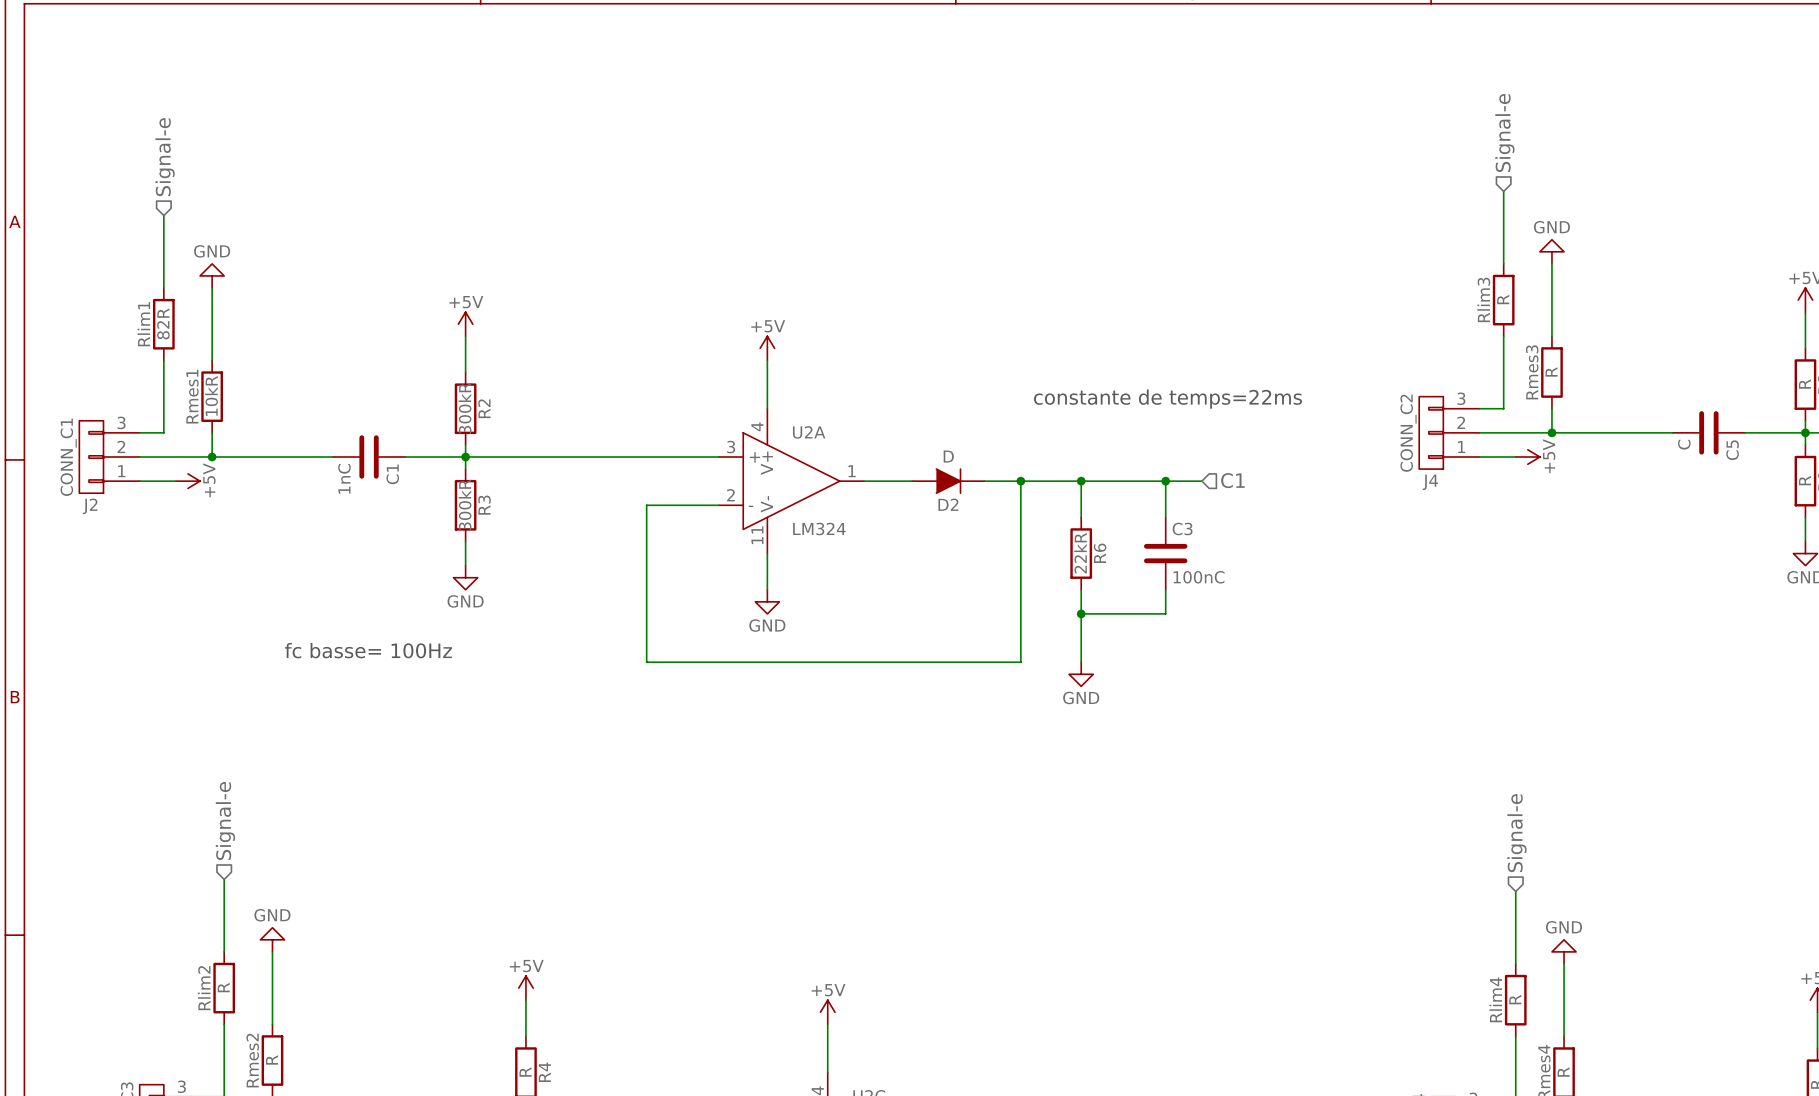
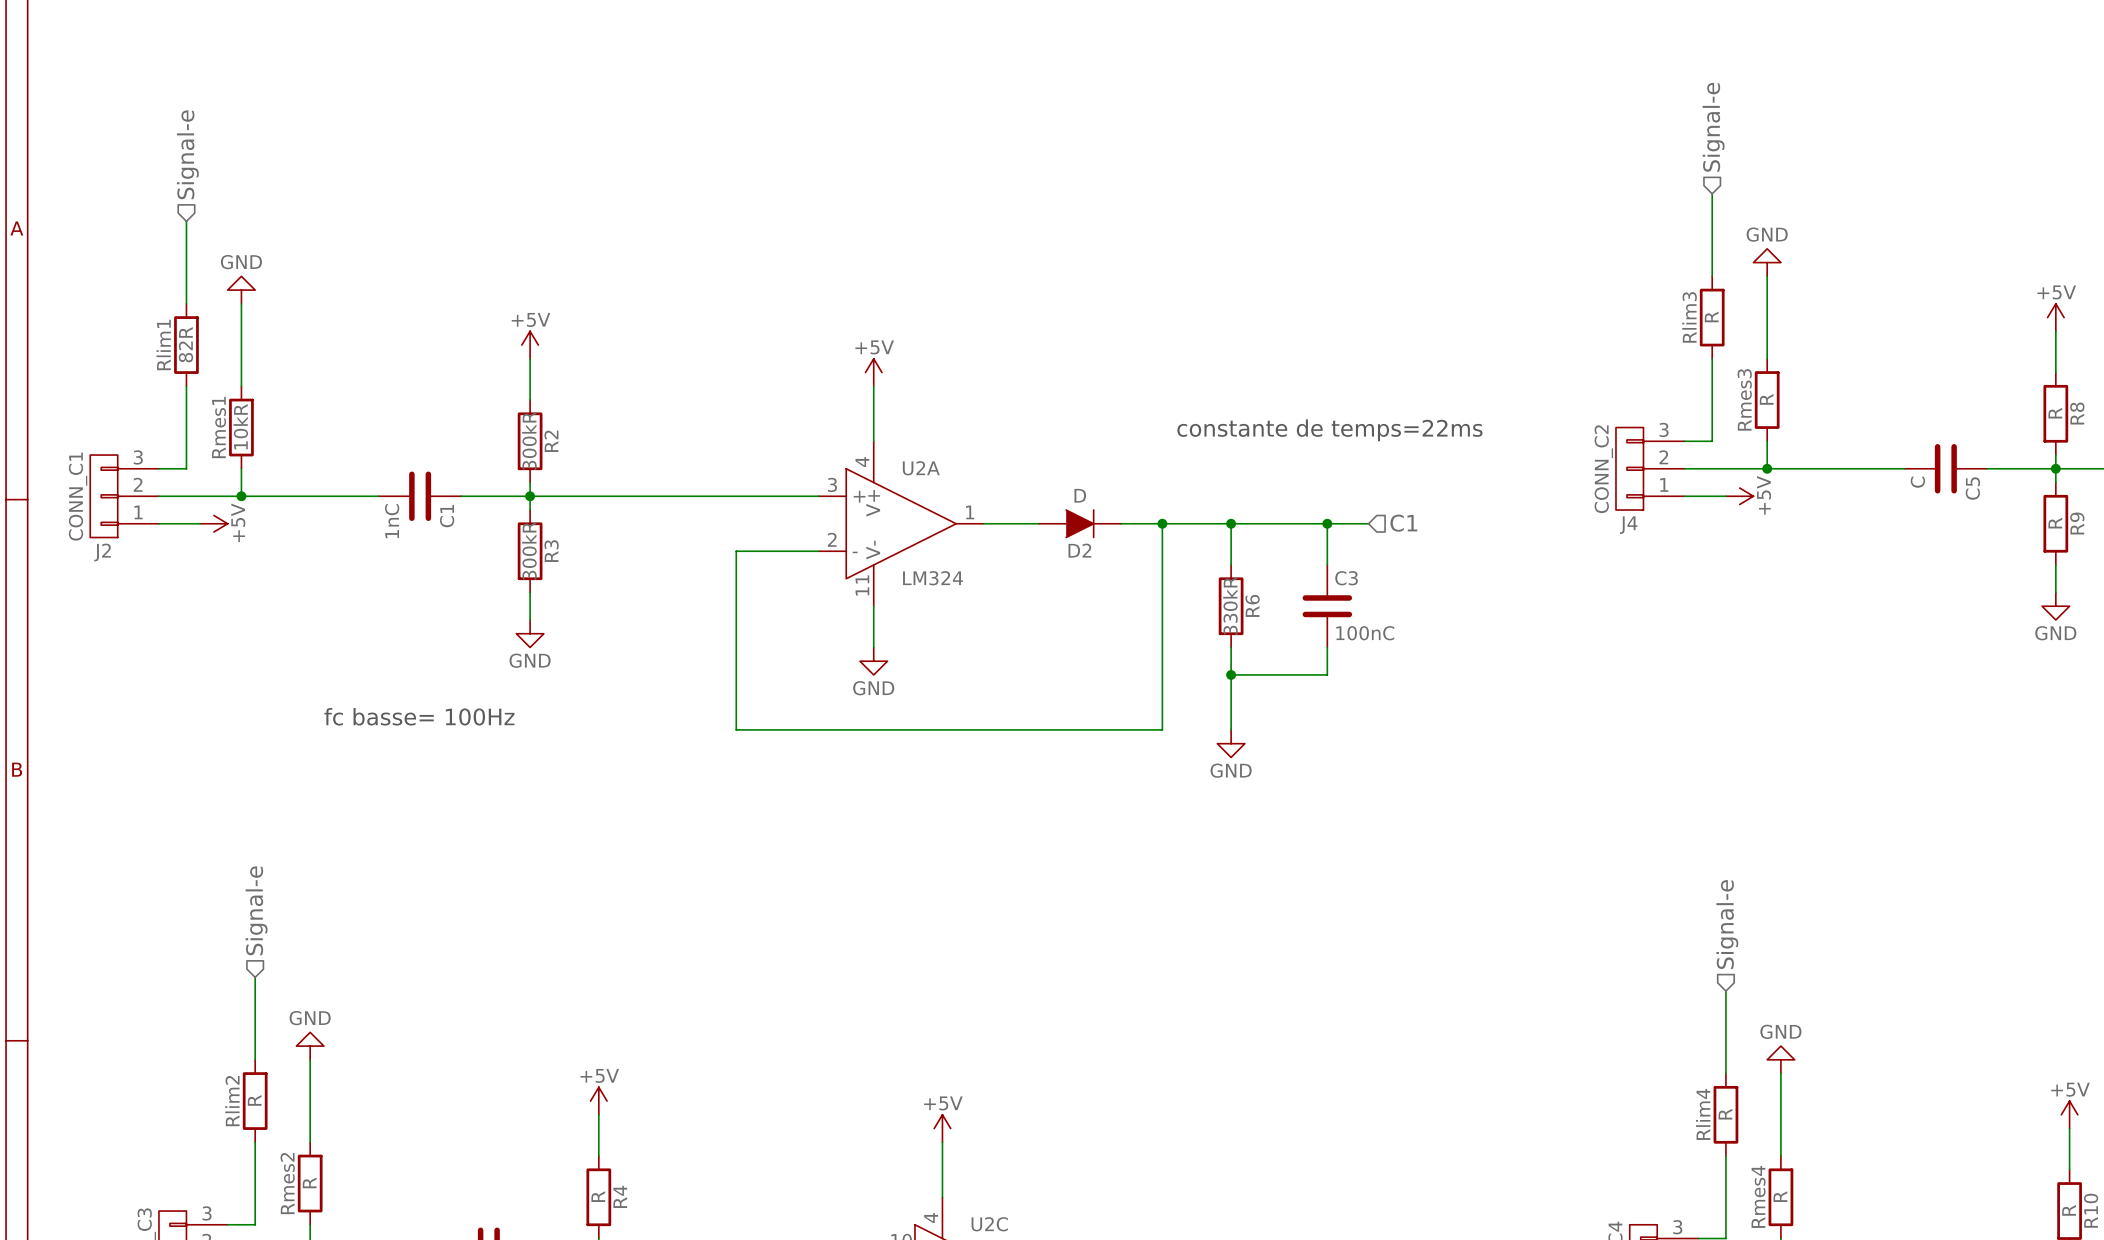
R6 value: 22kR (1080, 553) -> 330kR (1230, 605)

